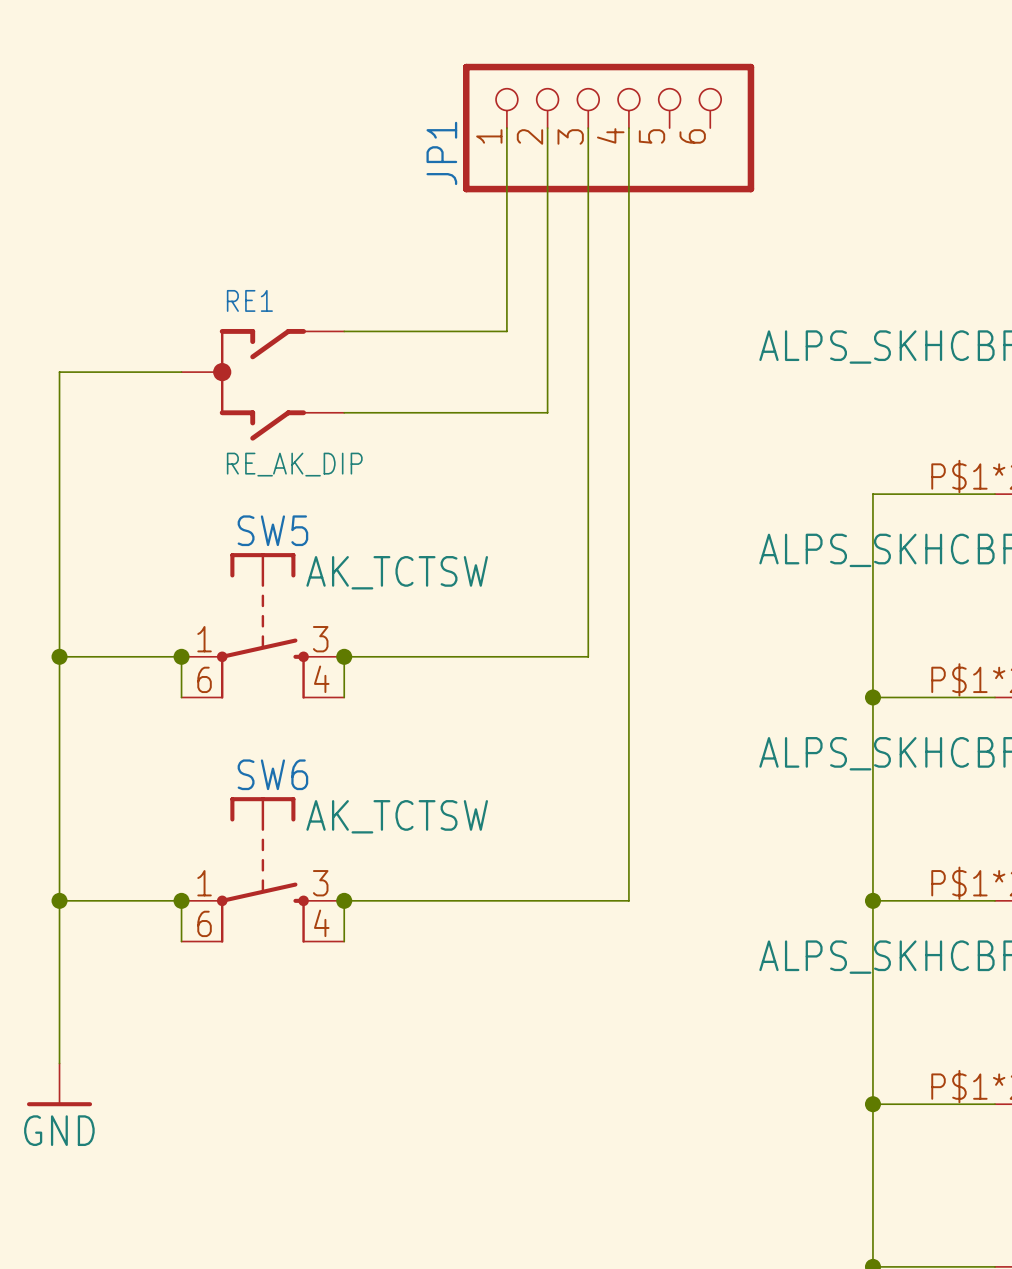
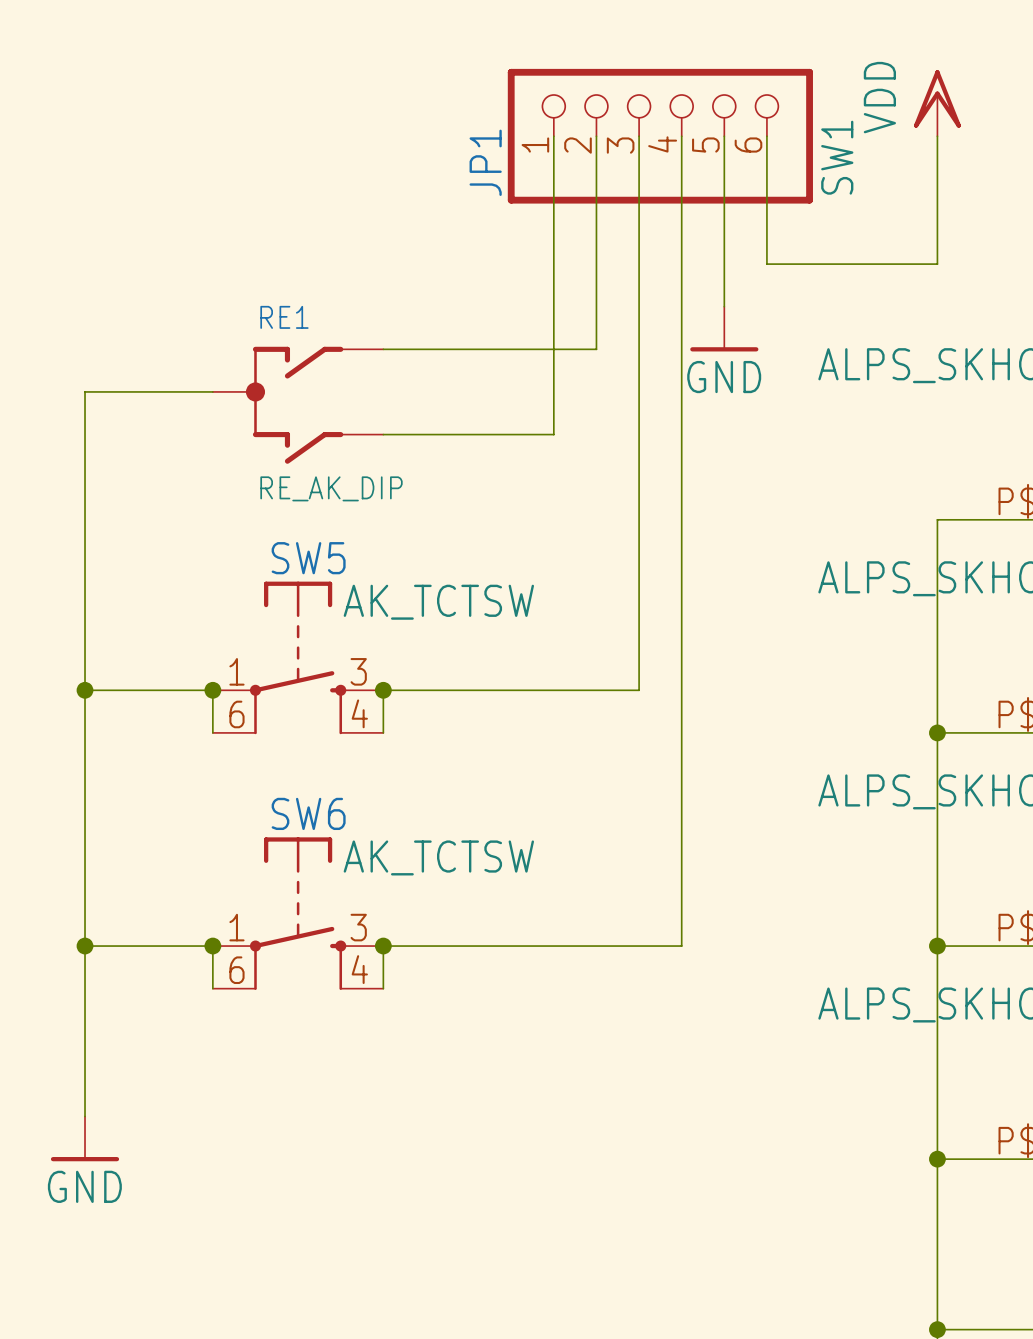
power symbol: none -> VDD (937, 103)
wire: none -> (724, 136) (724, 306)
wire: none -> (766, 136) (766, 264) (937, 264) (937, 136)
JP1 value: none -> SW1 (837, 157)
power symbol: none -> GND (724, 329)
wire: (547, 331) (547, 412) (506, 412) -> (596, 349) (553, 349) (553, 434)

